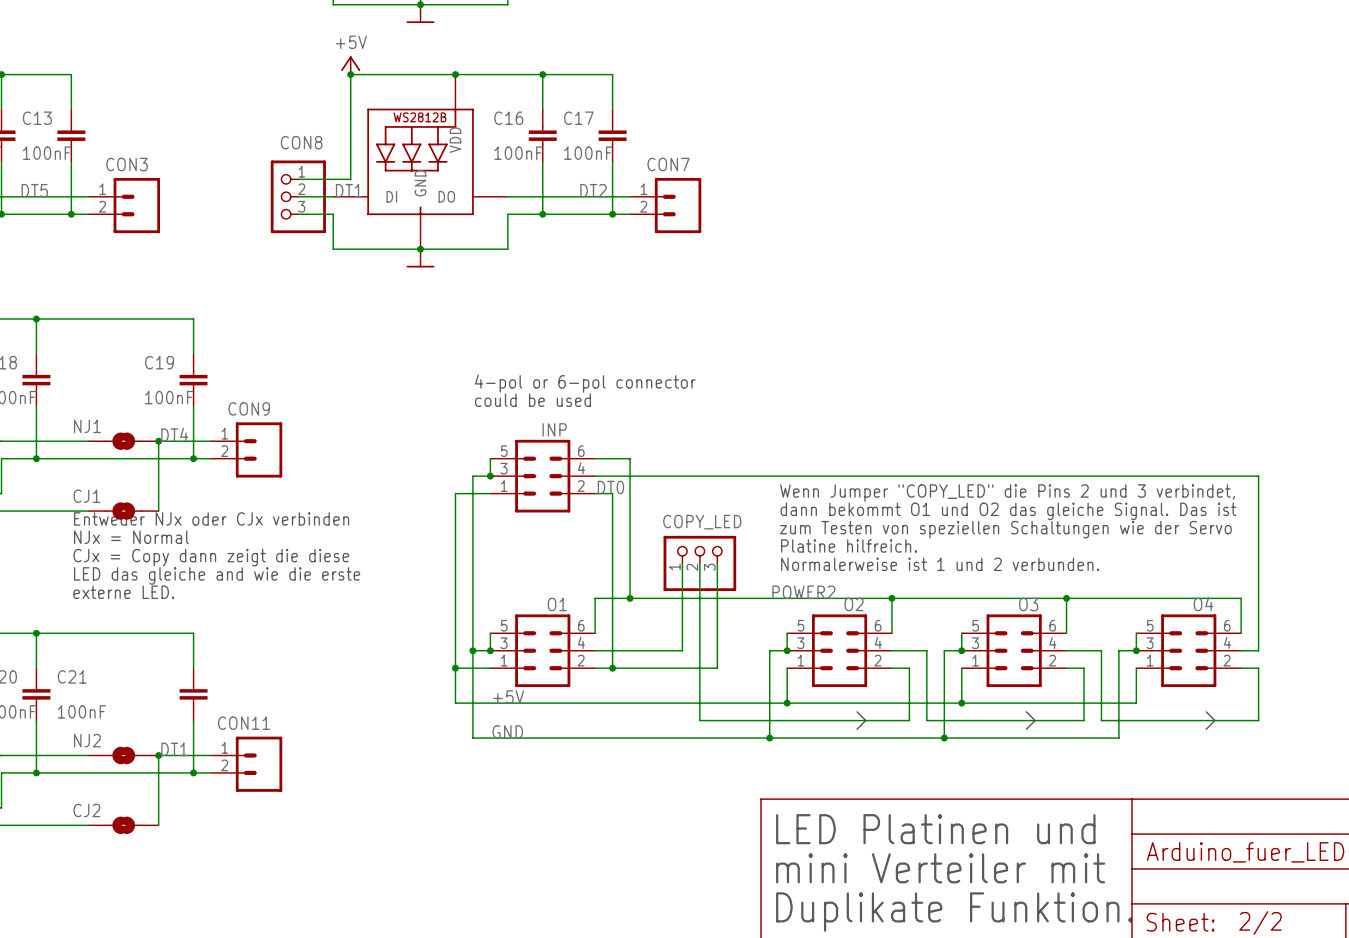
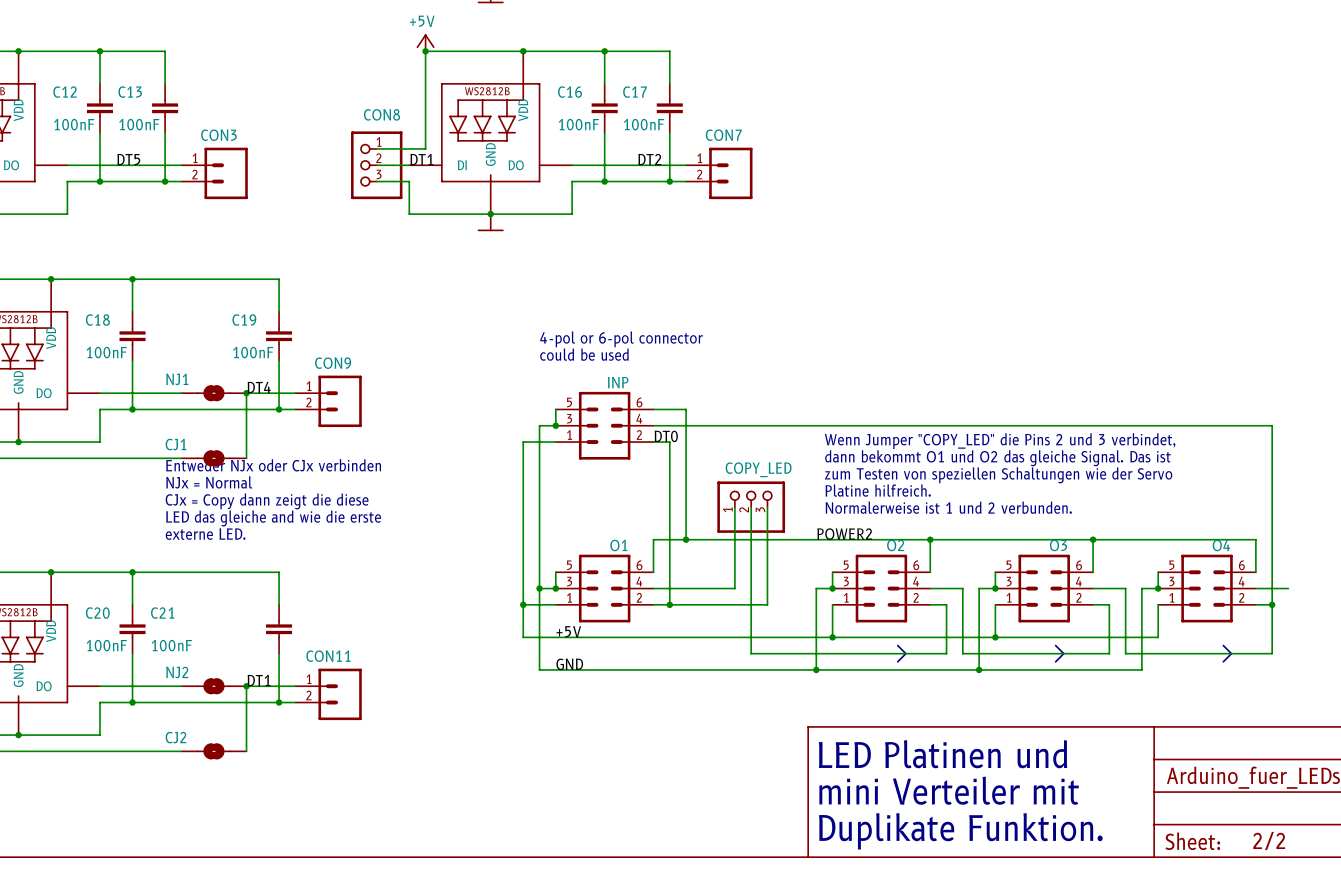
wire: none -> (1288, 588) (1272, 588) (1272, 604)
junction: none -> (1272, 604)

